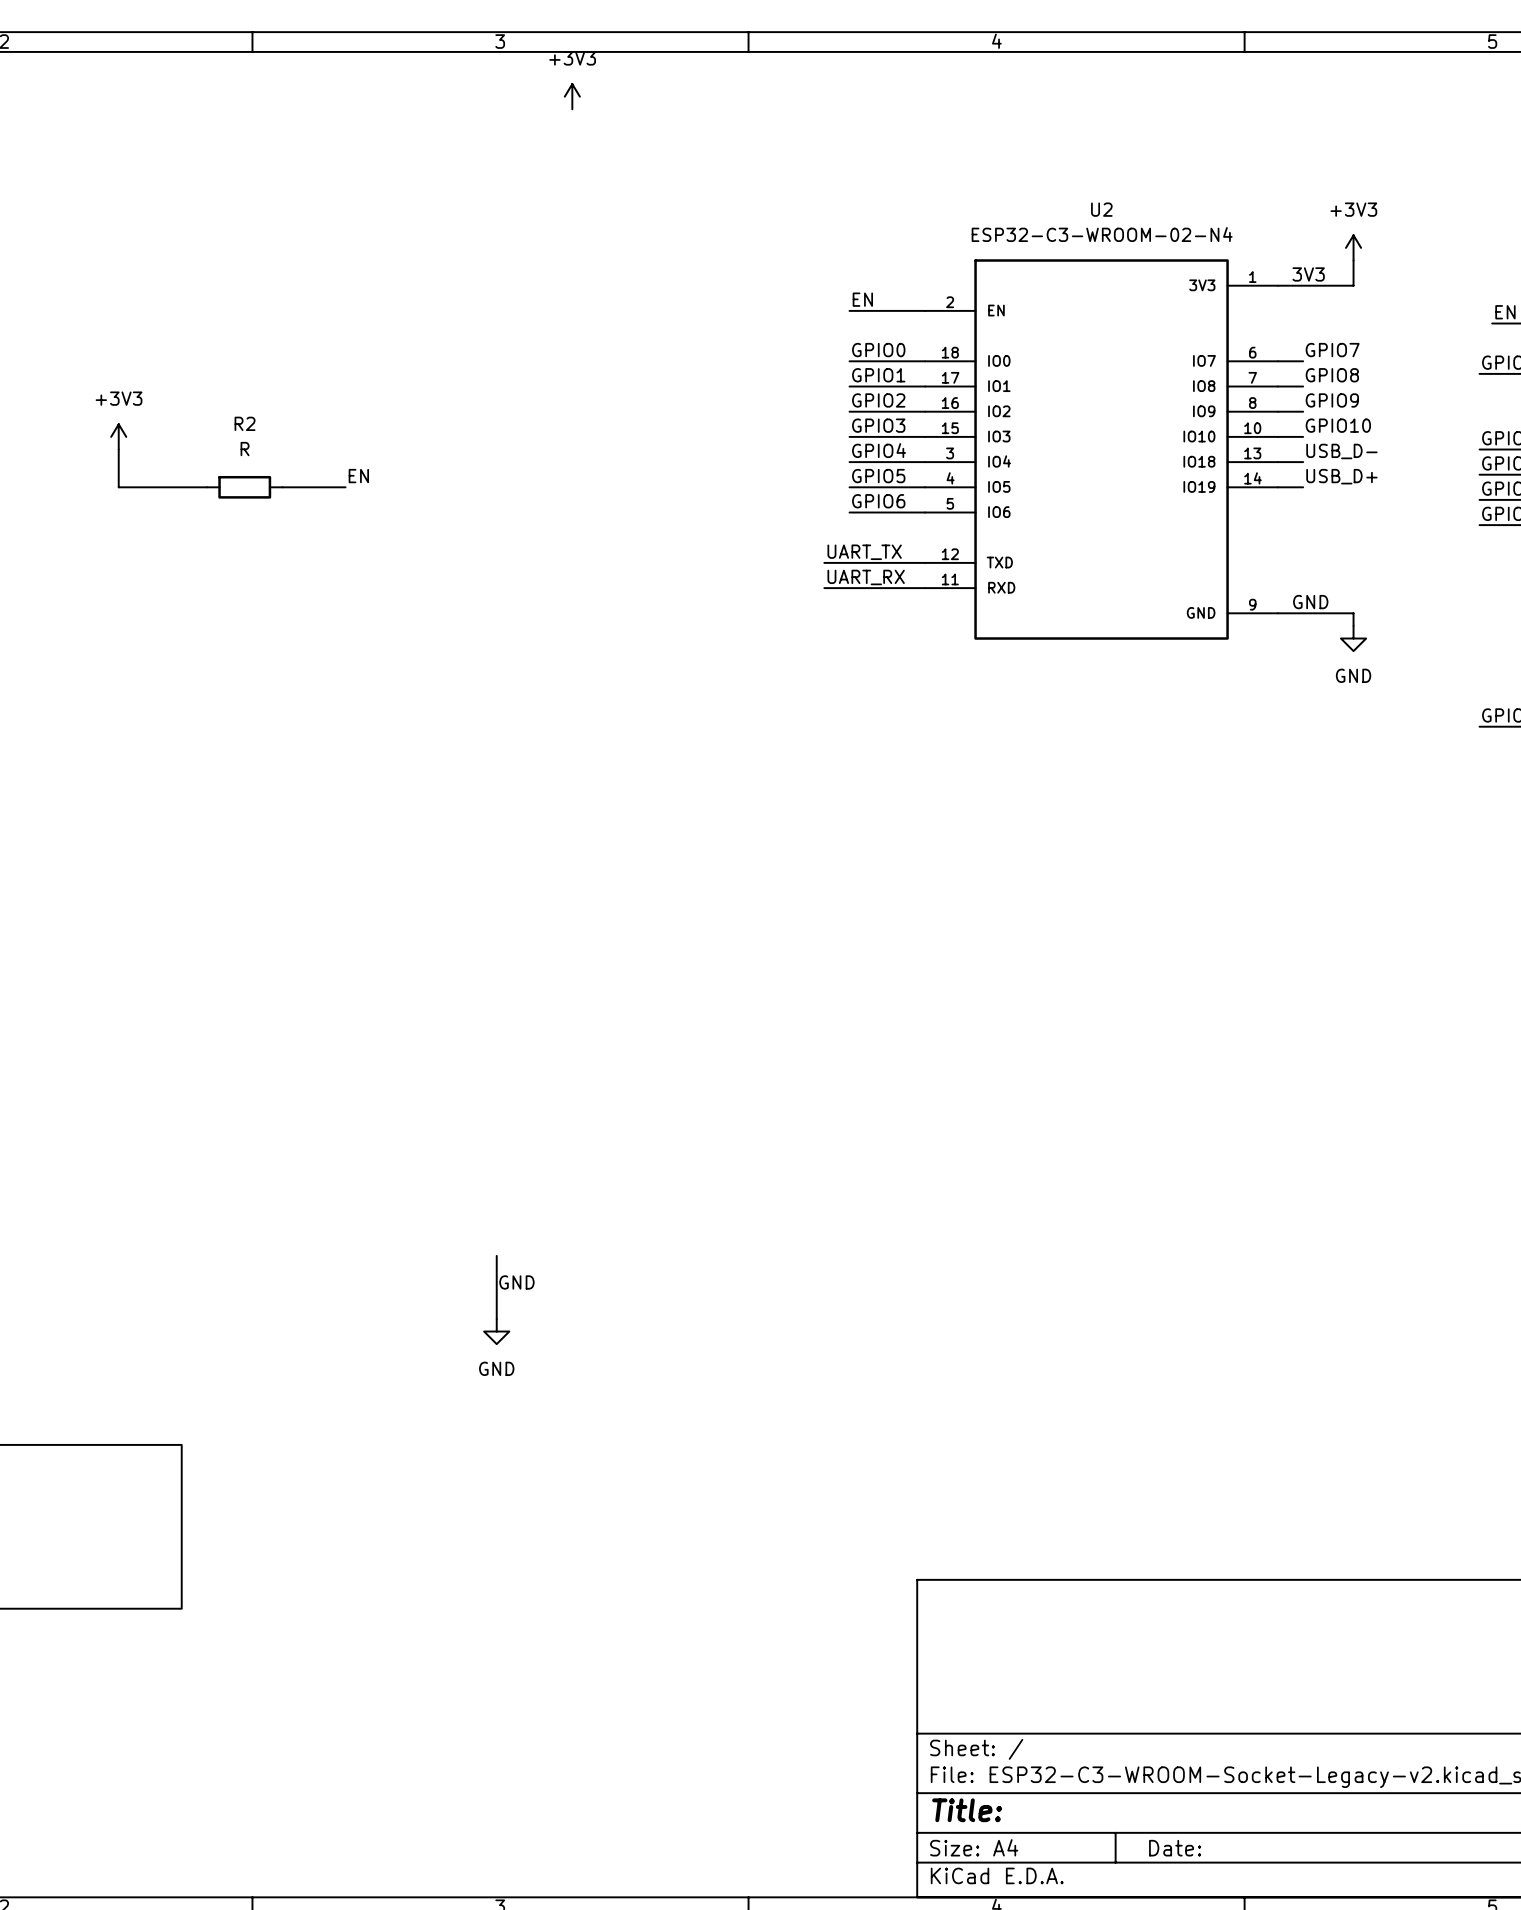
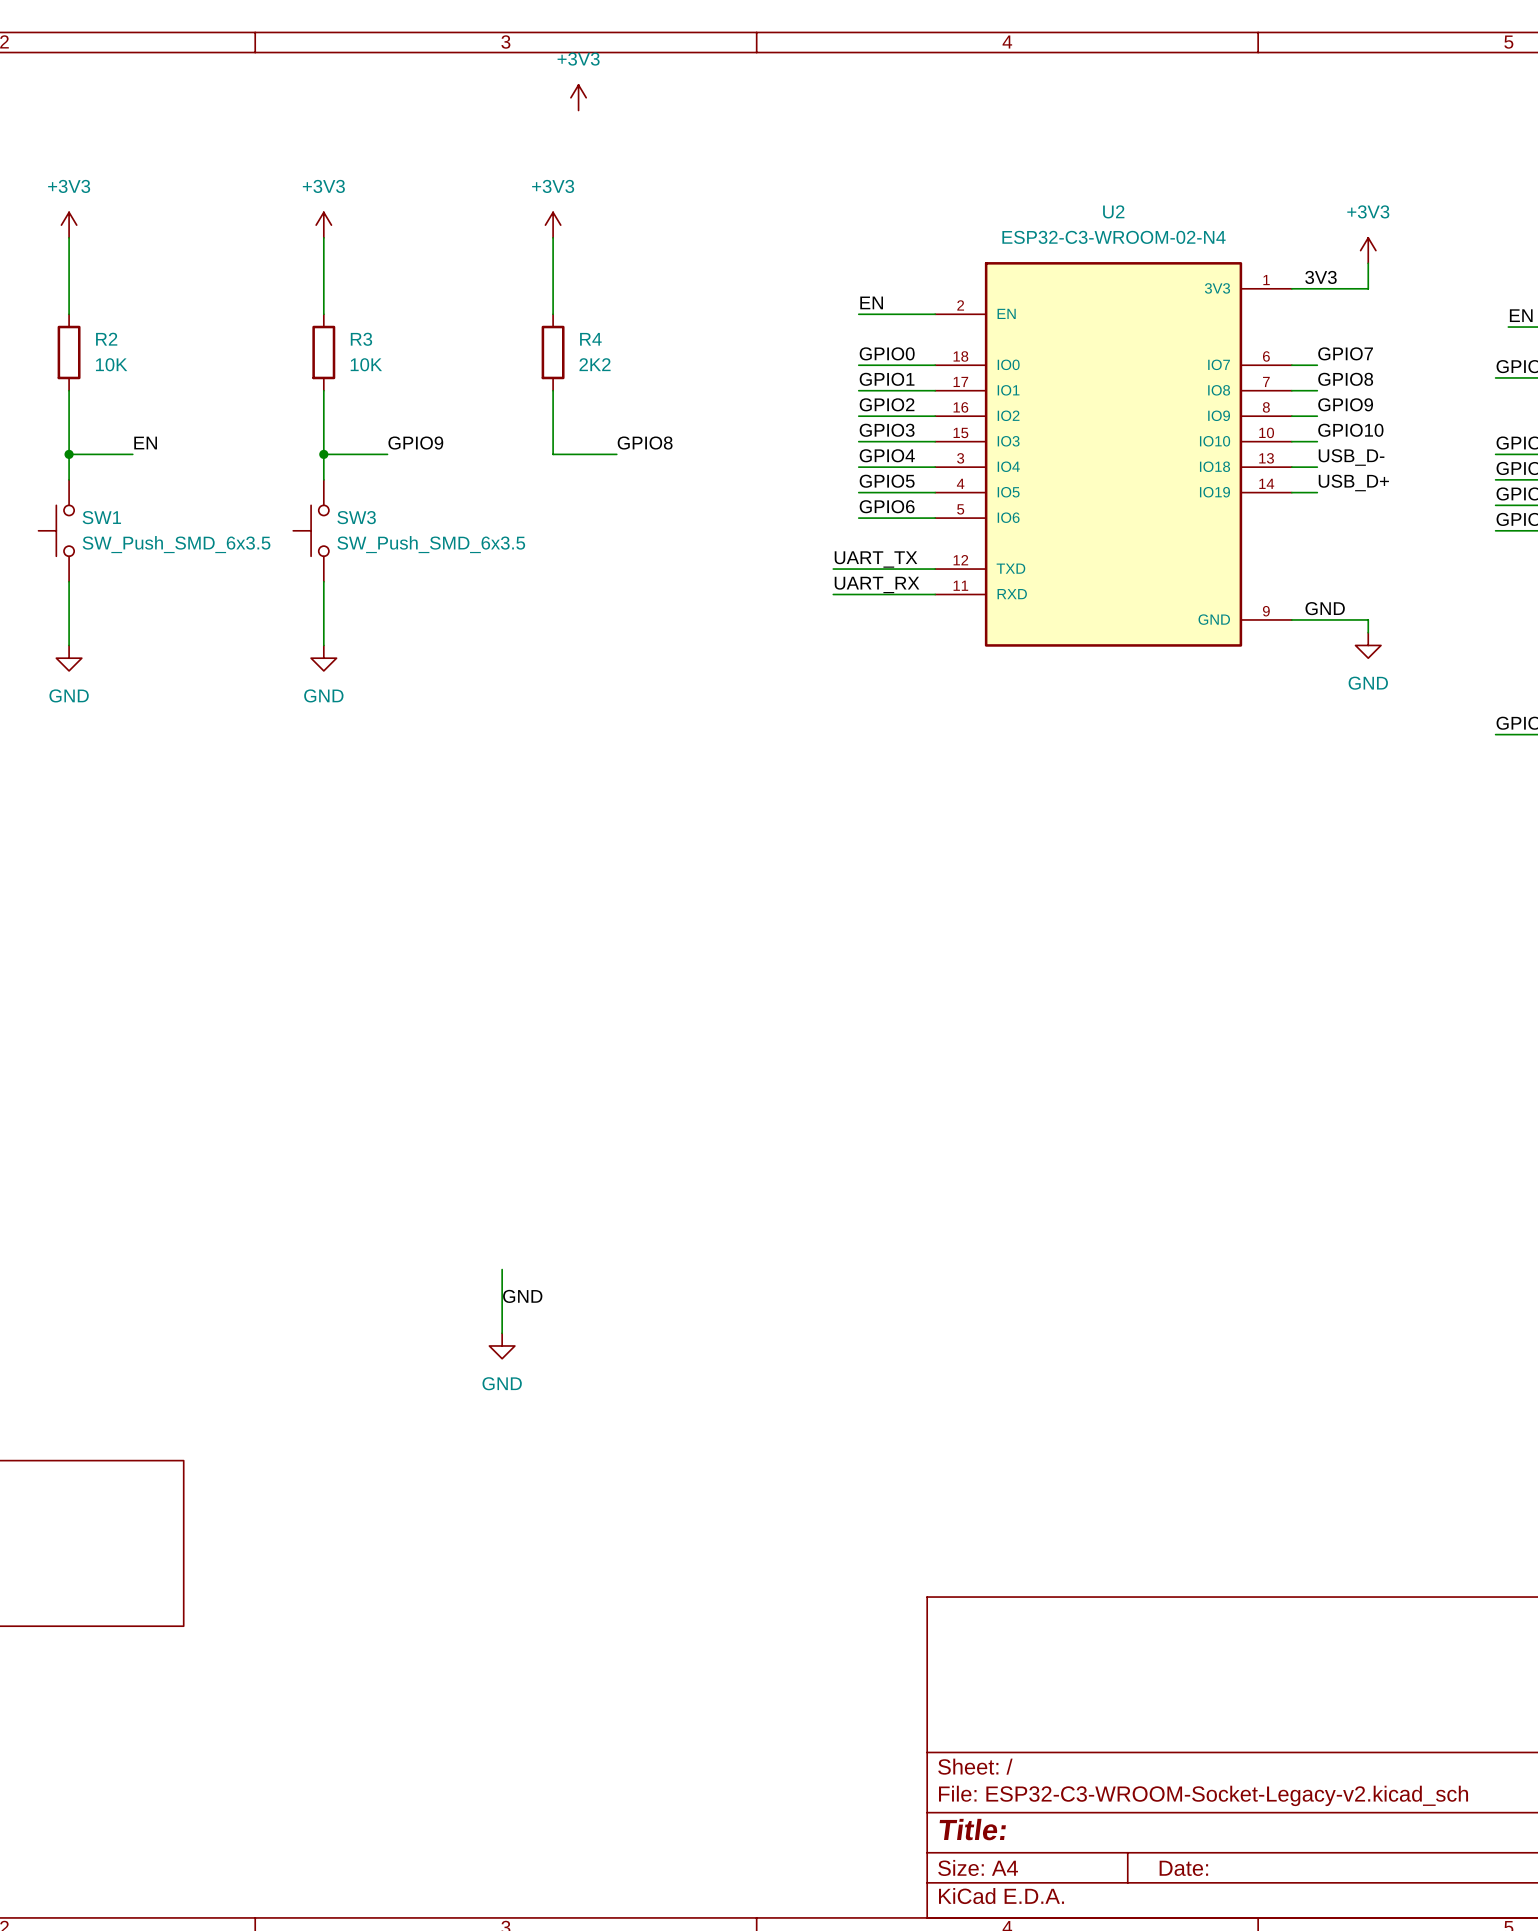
power symbol: none -> +3V3 (69, 225)
power symbol: none -> +3V3 (323, 225)
power symbol: none -> +3V3 (553, 225)
wire: none -> (69, 237) (69, 314)
wire: none -> (323, 237) (323, 314)
wire: none -> (553, 237) (553, 314)
R3: none -> 10K (323, 352)
R4: none -> 2K2 (553, 352)
wire: none -> (69, 390) (69, 479)
wire: none -> (323, 390) (323, 479)
wire: none -> (553, 390) (553, 454) (616, 454)
R2 name position: R2 (245, 423) -> R2 (106, 339)
power symbol: +3V3 (118, 436) -> none
label: none -> GPIO9 (415, 443)
label: none -> GPIO8 (645, 443)
wire: none -> (69, 454) (132, 454)
junction: none -> (69, 454)
wire: (118, 449) (118, 487) (206, 487) -> none
R2 value: R (245, 449) -> 10K (111, 364)
junction: none -> (323, 454)
label position: EN (358, 476) -> EN (145, 443)
R2 rotation: 0° (244, 487) -> 90° clockwise (69, 352)
R2 position: (244, 487) -> (69, 352)
wire: (282, 487) (345, 487) -> (323, 454) (387, 454)
SW1: none -> SW_Push_SMD_6x3.5 (56, 530)
SW3: none -> SW_Push_SMD_6x3.5 (311, 530)
wire: none -> (69, 581) (69, 645)
wire: none -> (323, 581) (323, 645)
power symbol: none -> GND (69, 658)
power symbol: none -> GND (323, 658)

